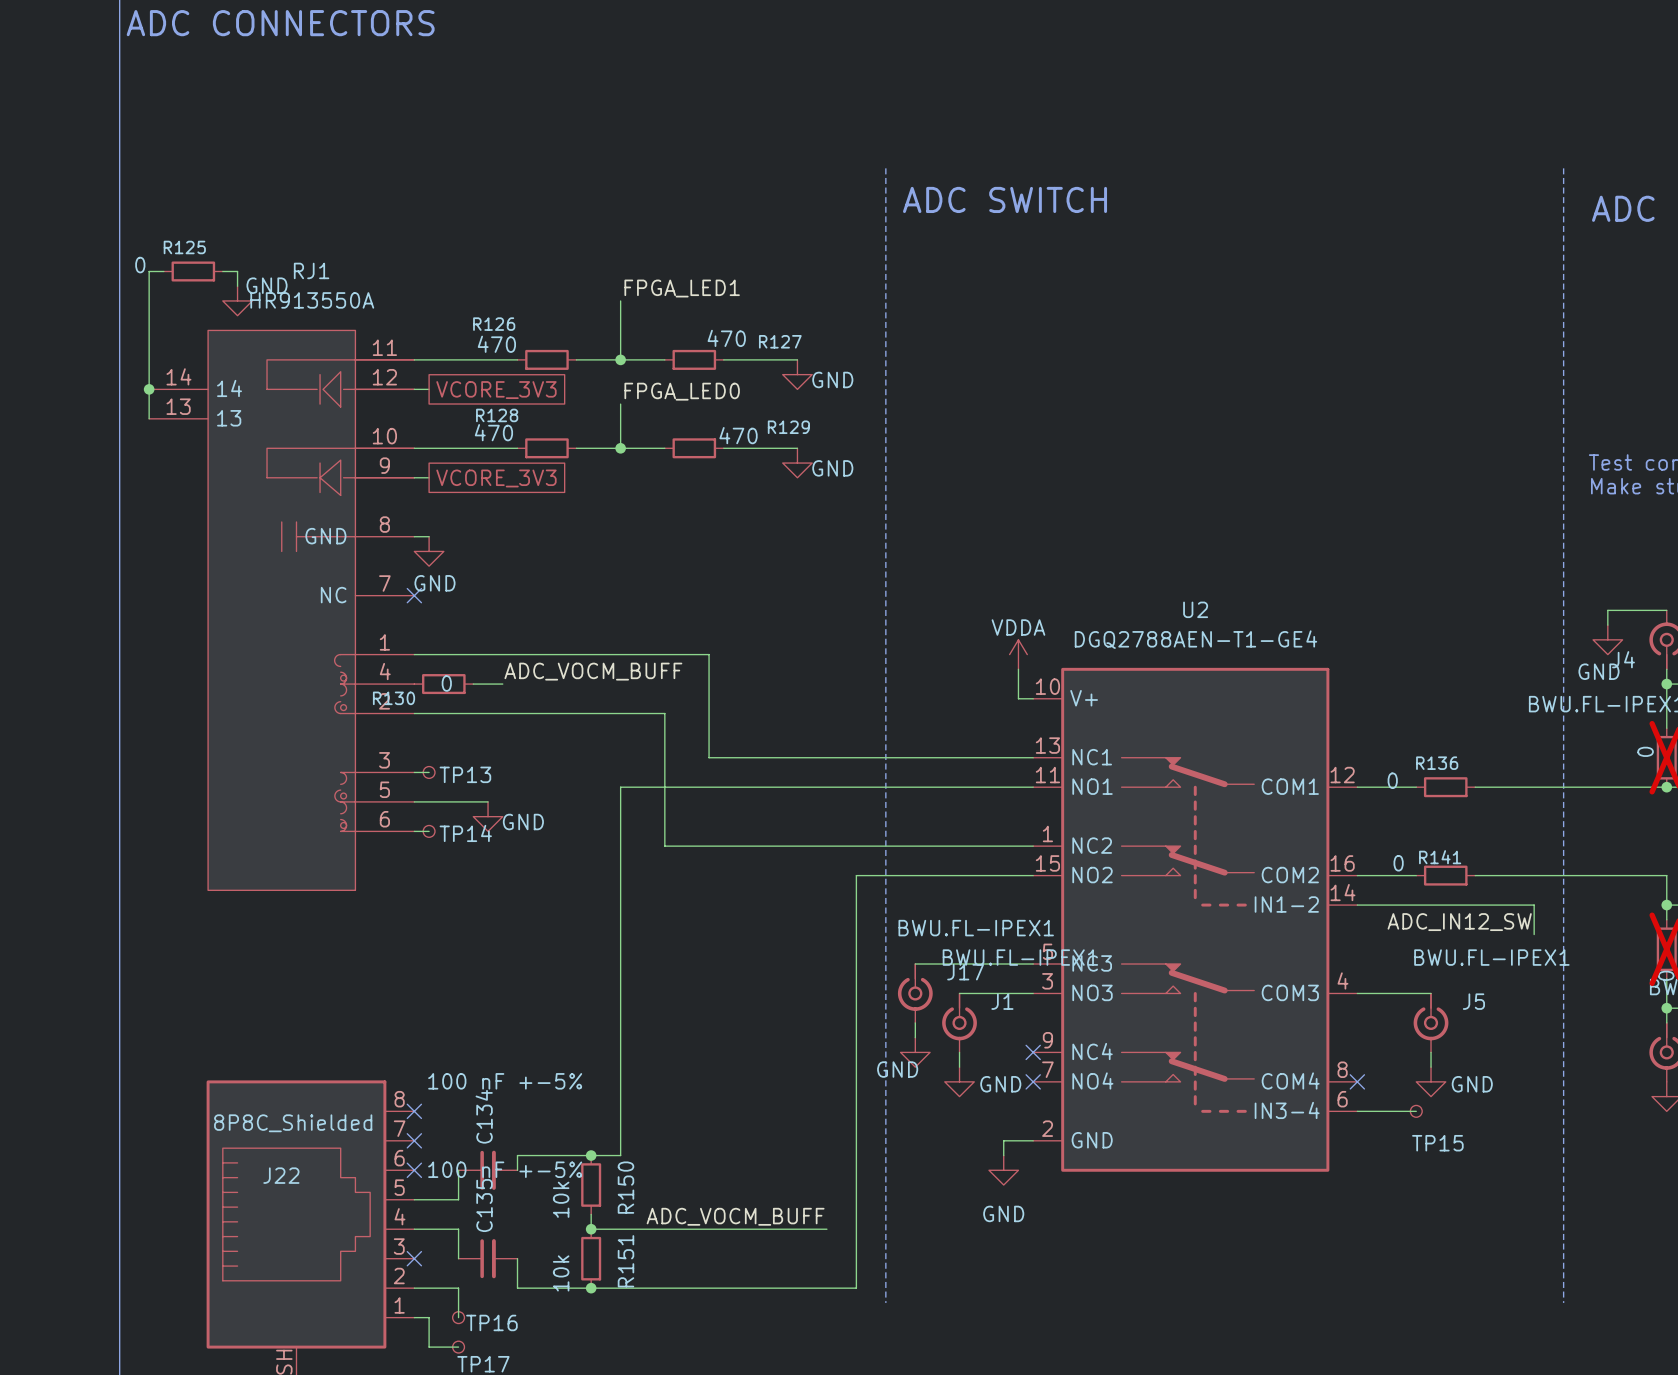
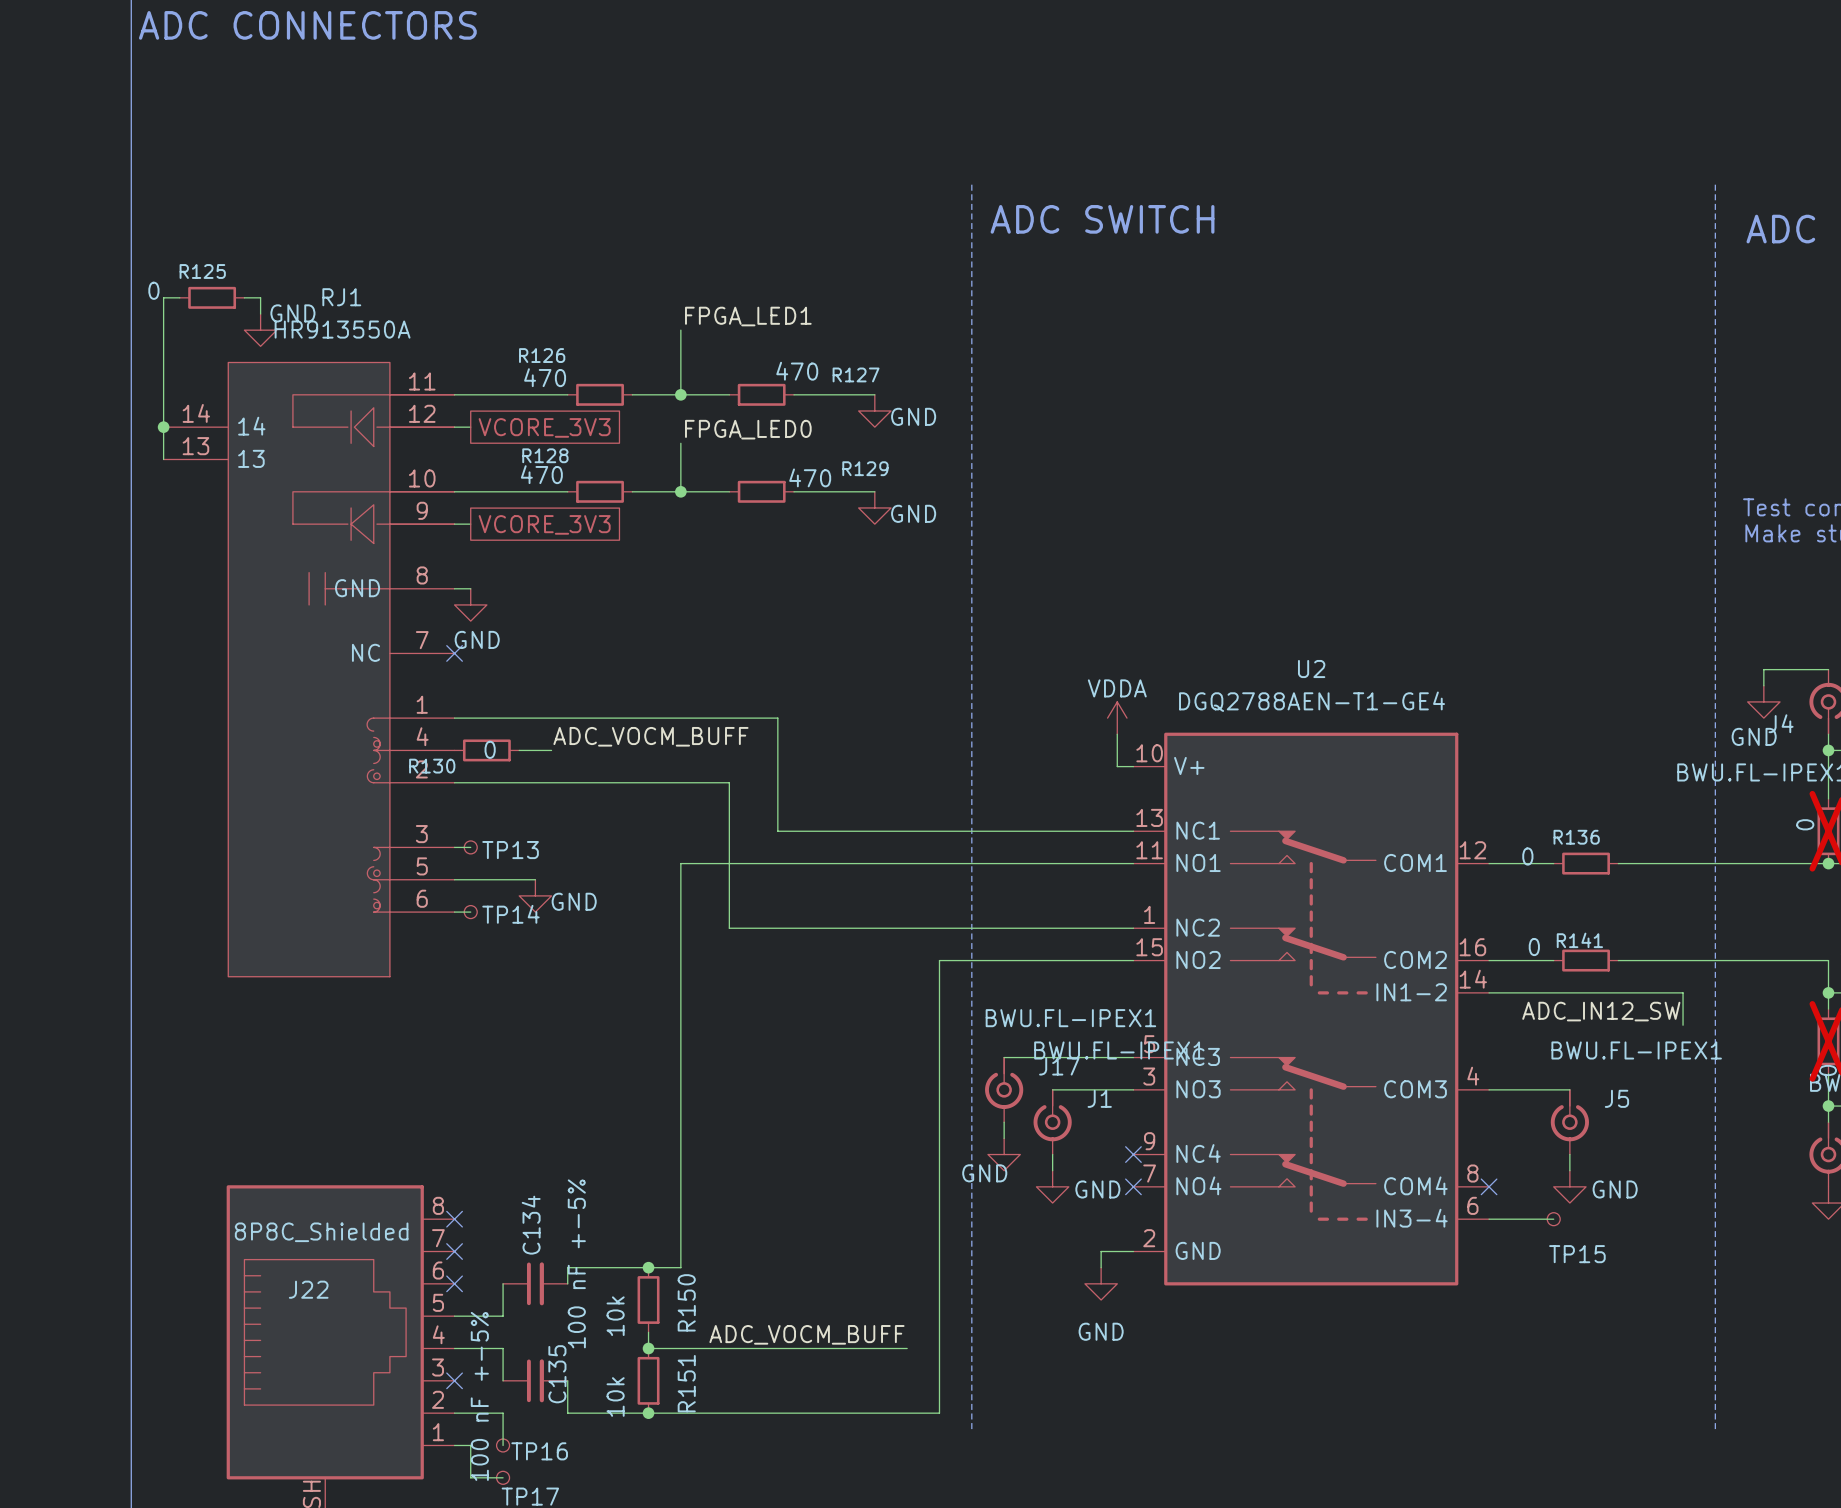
C134 value rotation: 0° (505, 1081) -> 90° counterclockwise (576, 1263)
C135 value rotation: 0° (505, 1169) -> 90° counterclockwise (479, 1396)
C135 name position: C135 (484, 1205) -> C135 (557, 1374)

